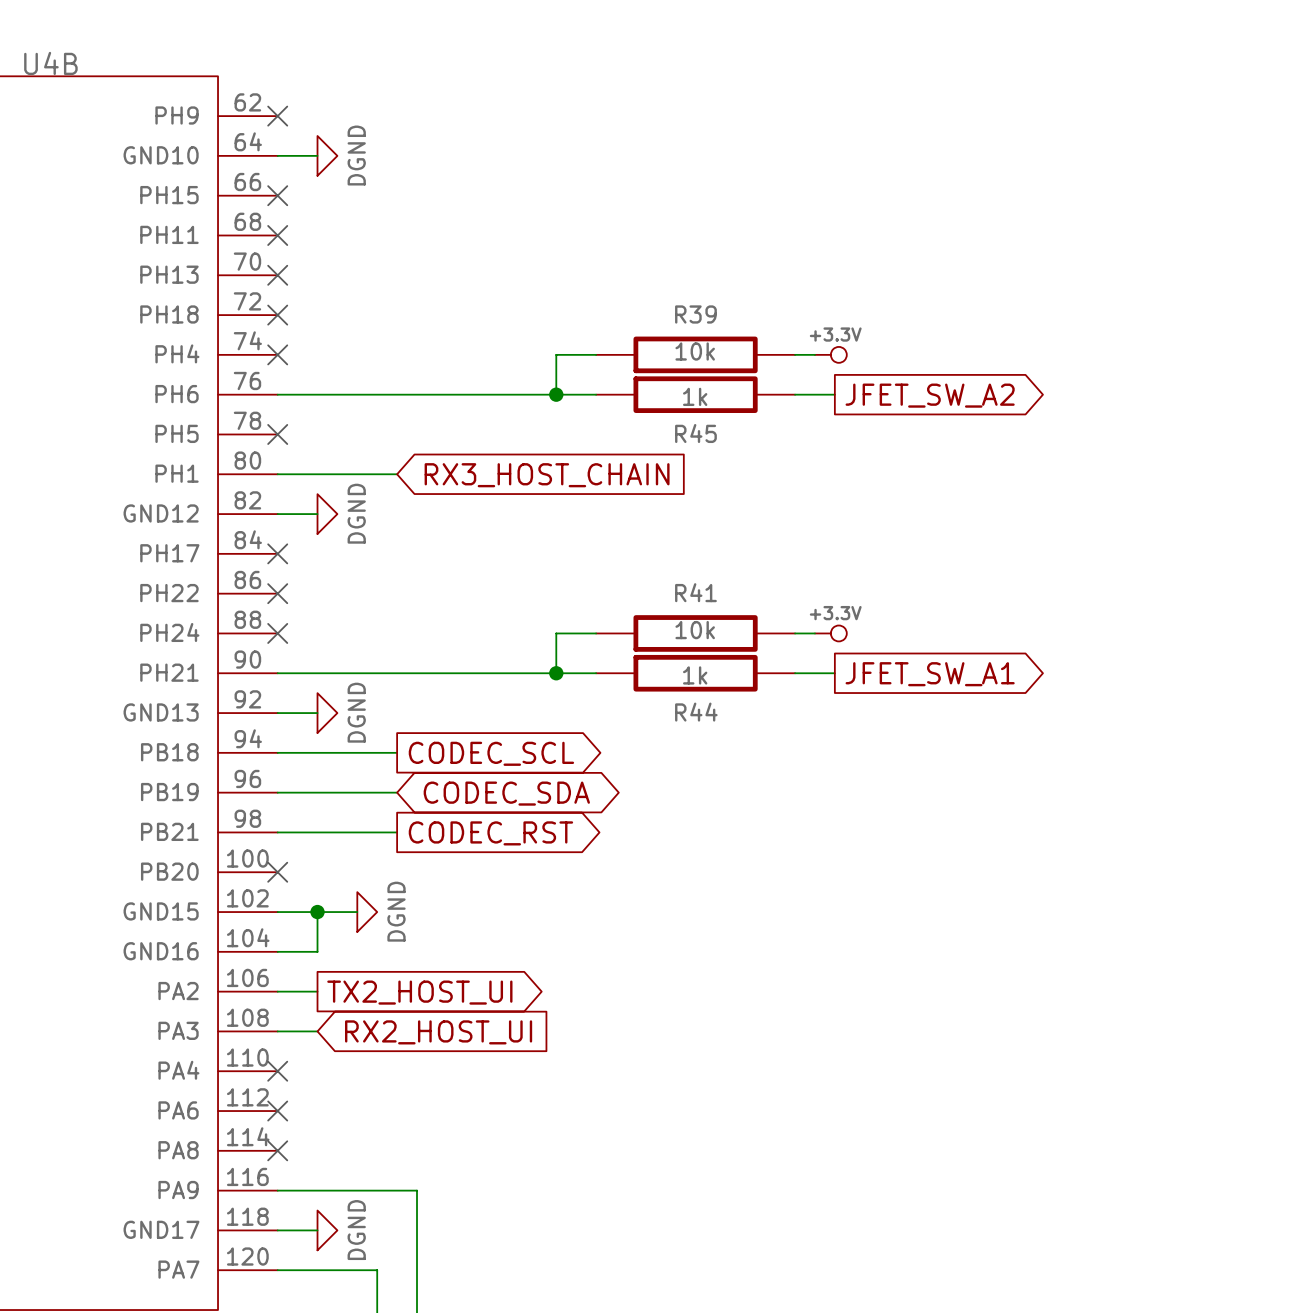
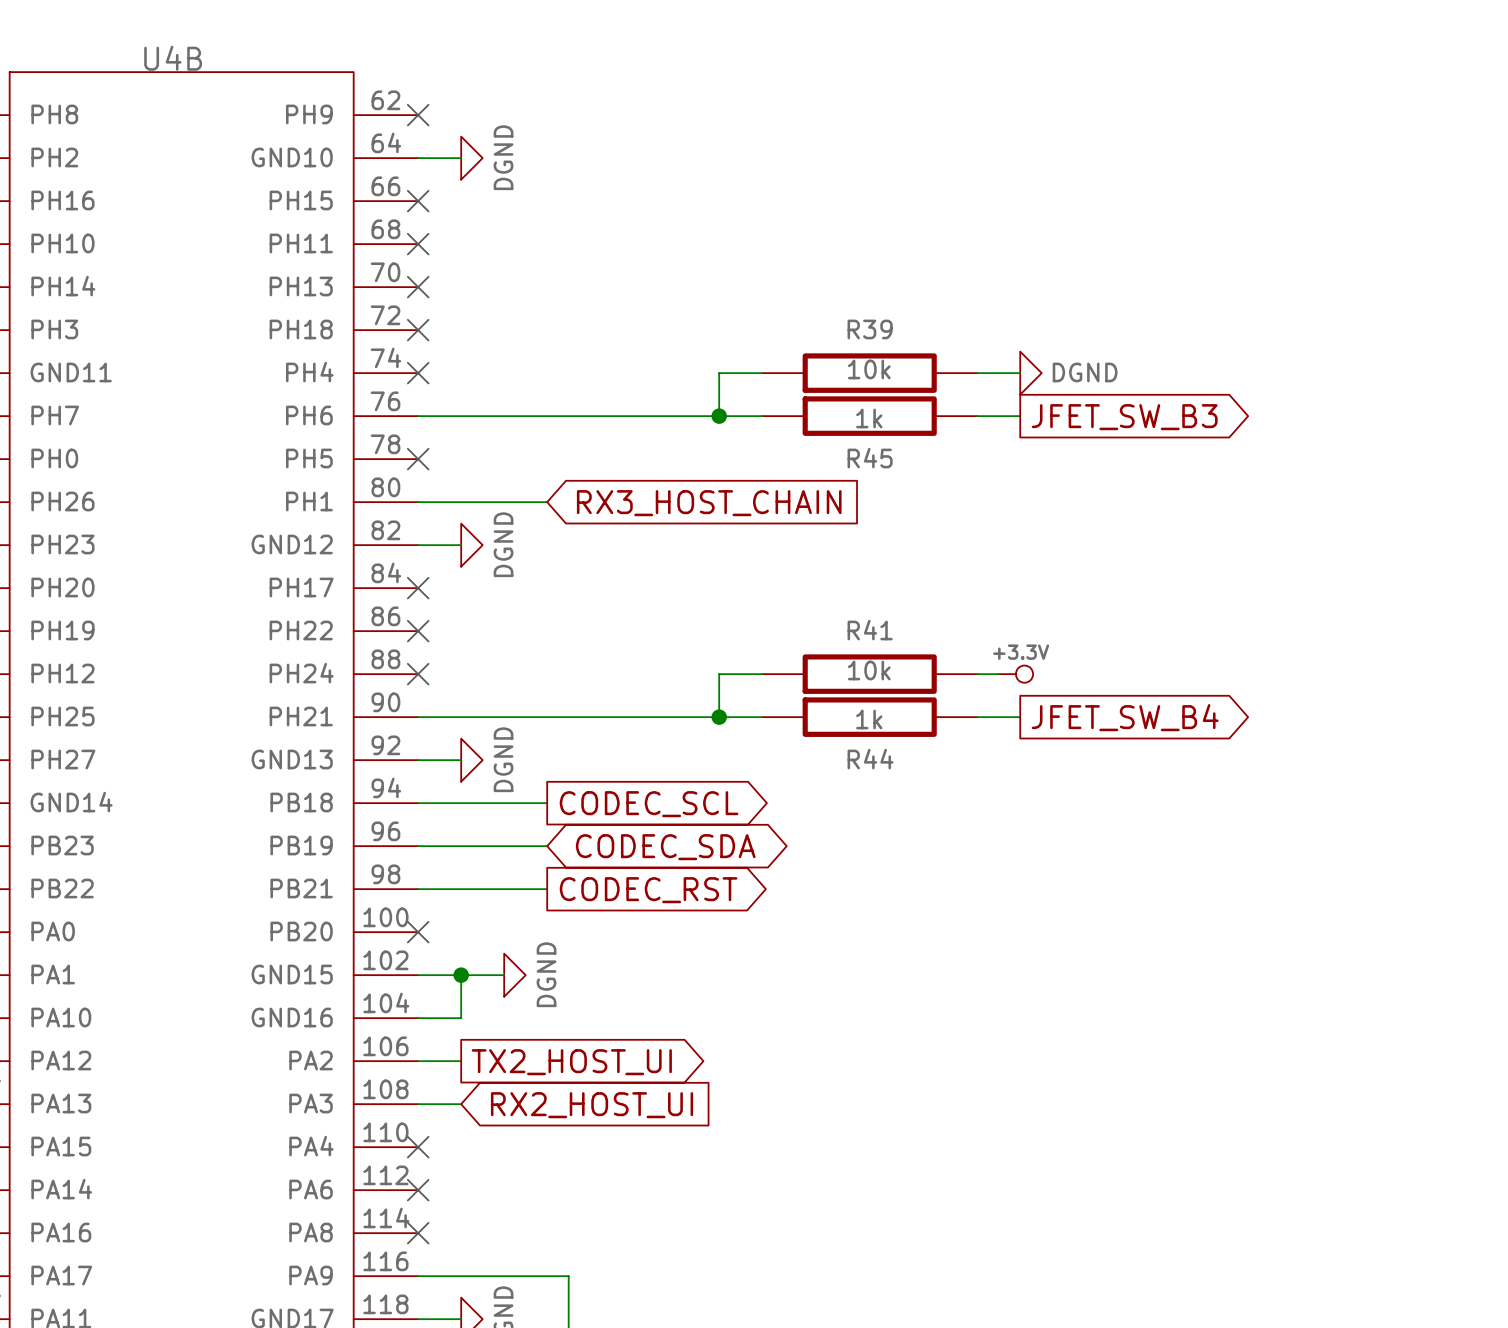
power symbol: +3.3V (830, 354) -> DGND (1030, 373)
global label: JFET_SW_A2 (930, 395) -> JFET_SW_B3 (1124, 417)
global label: JFET_SW_A1 (930, 674) -> JFET_SW_B4 (1125, 717)

